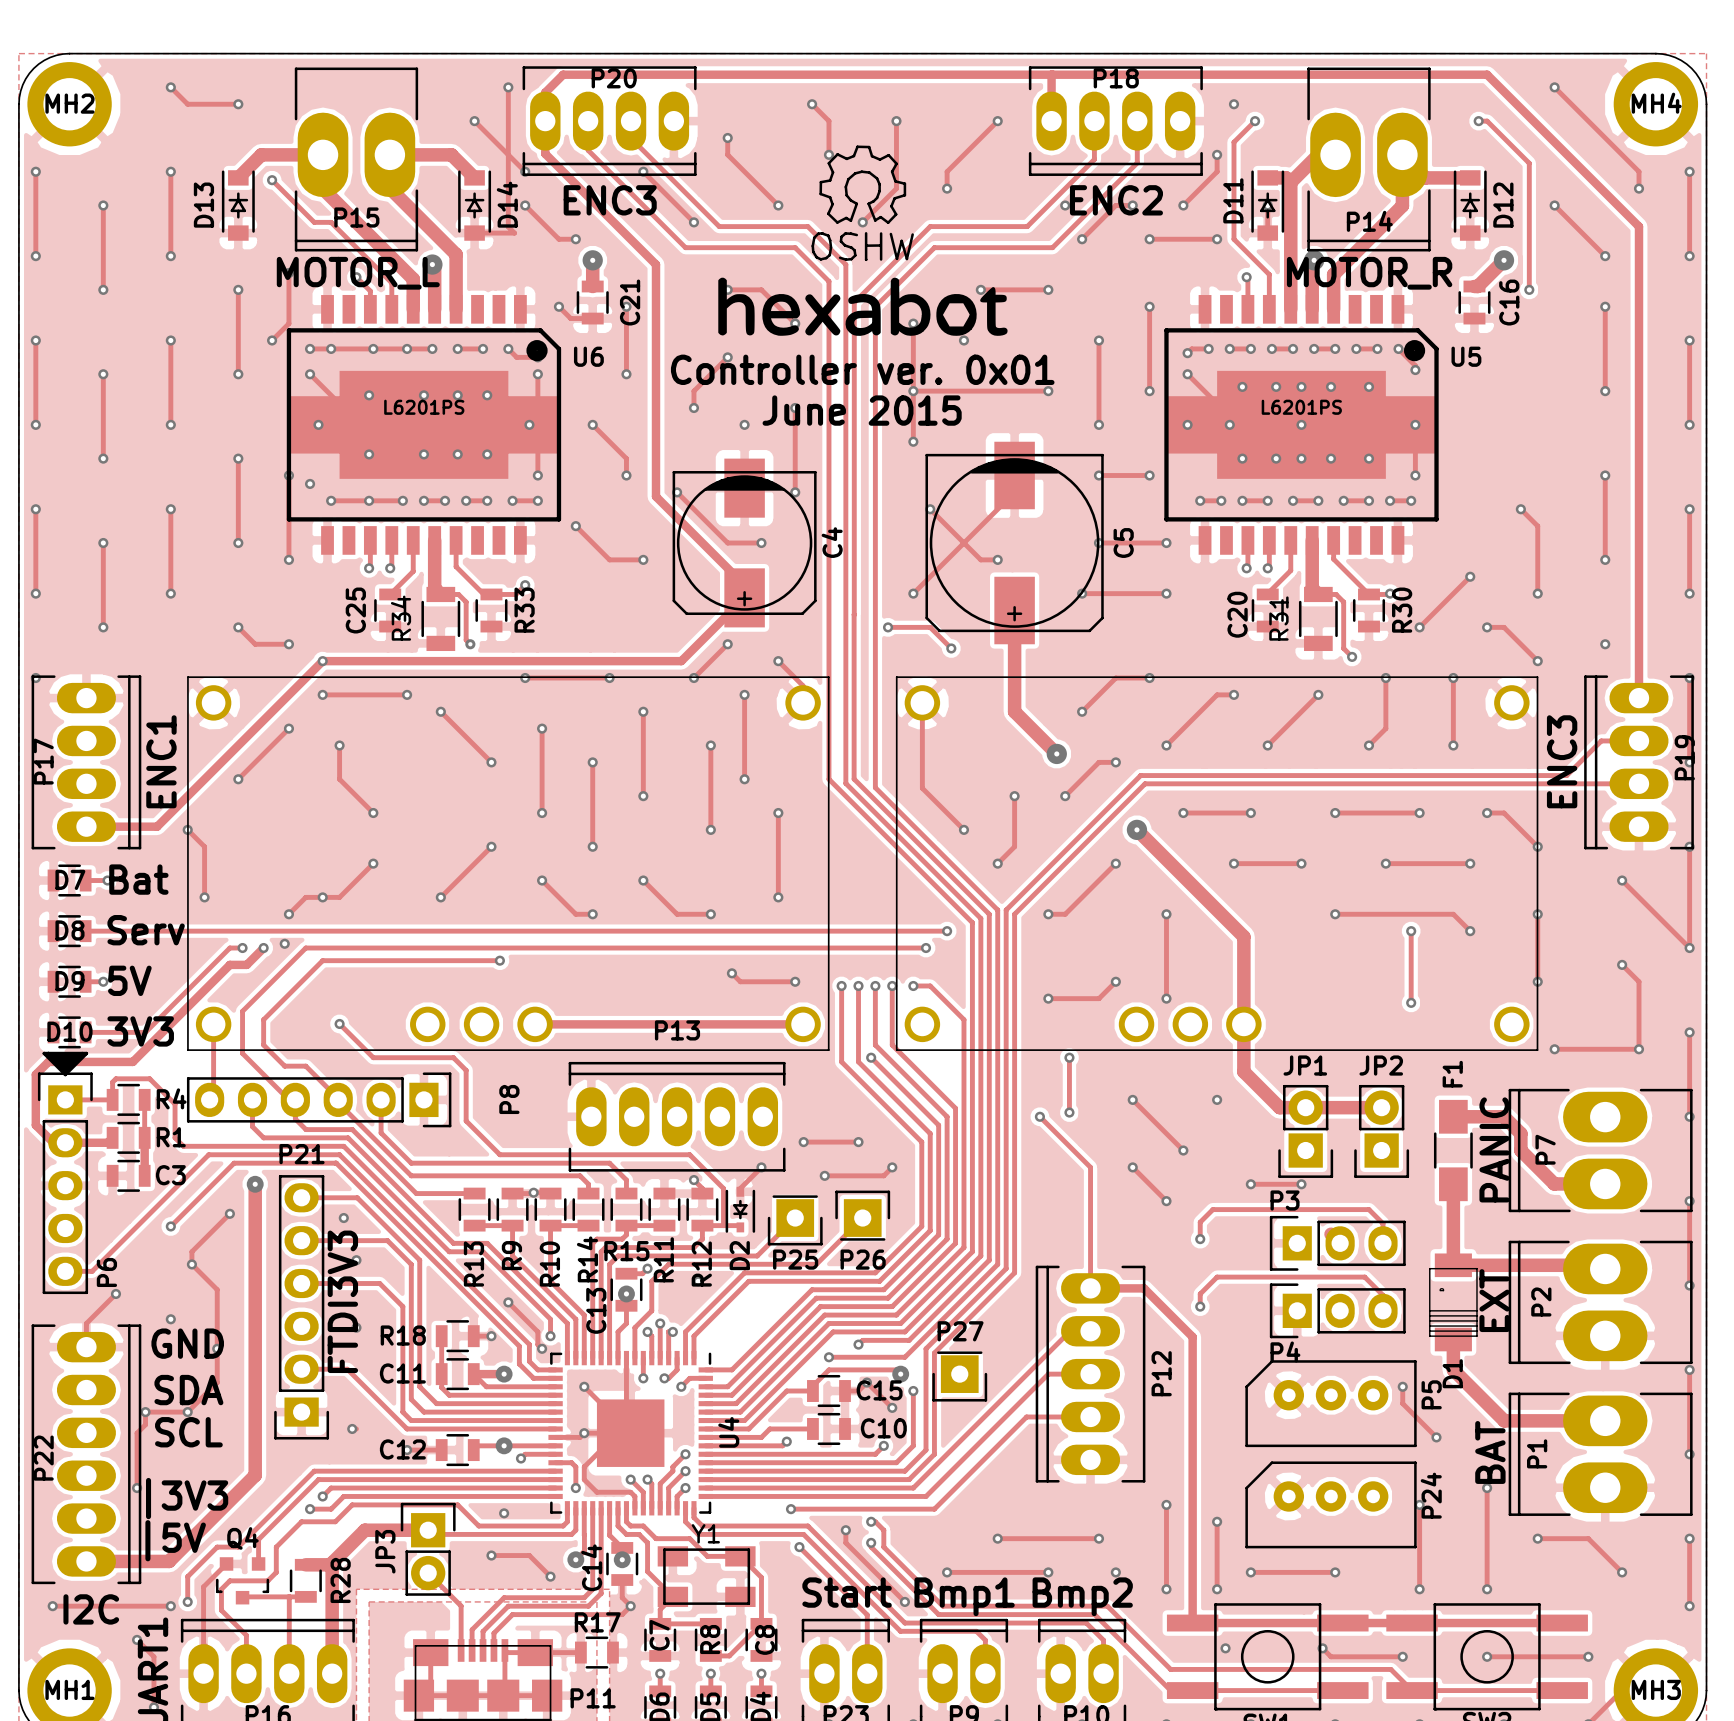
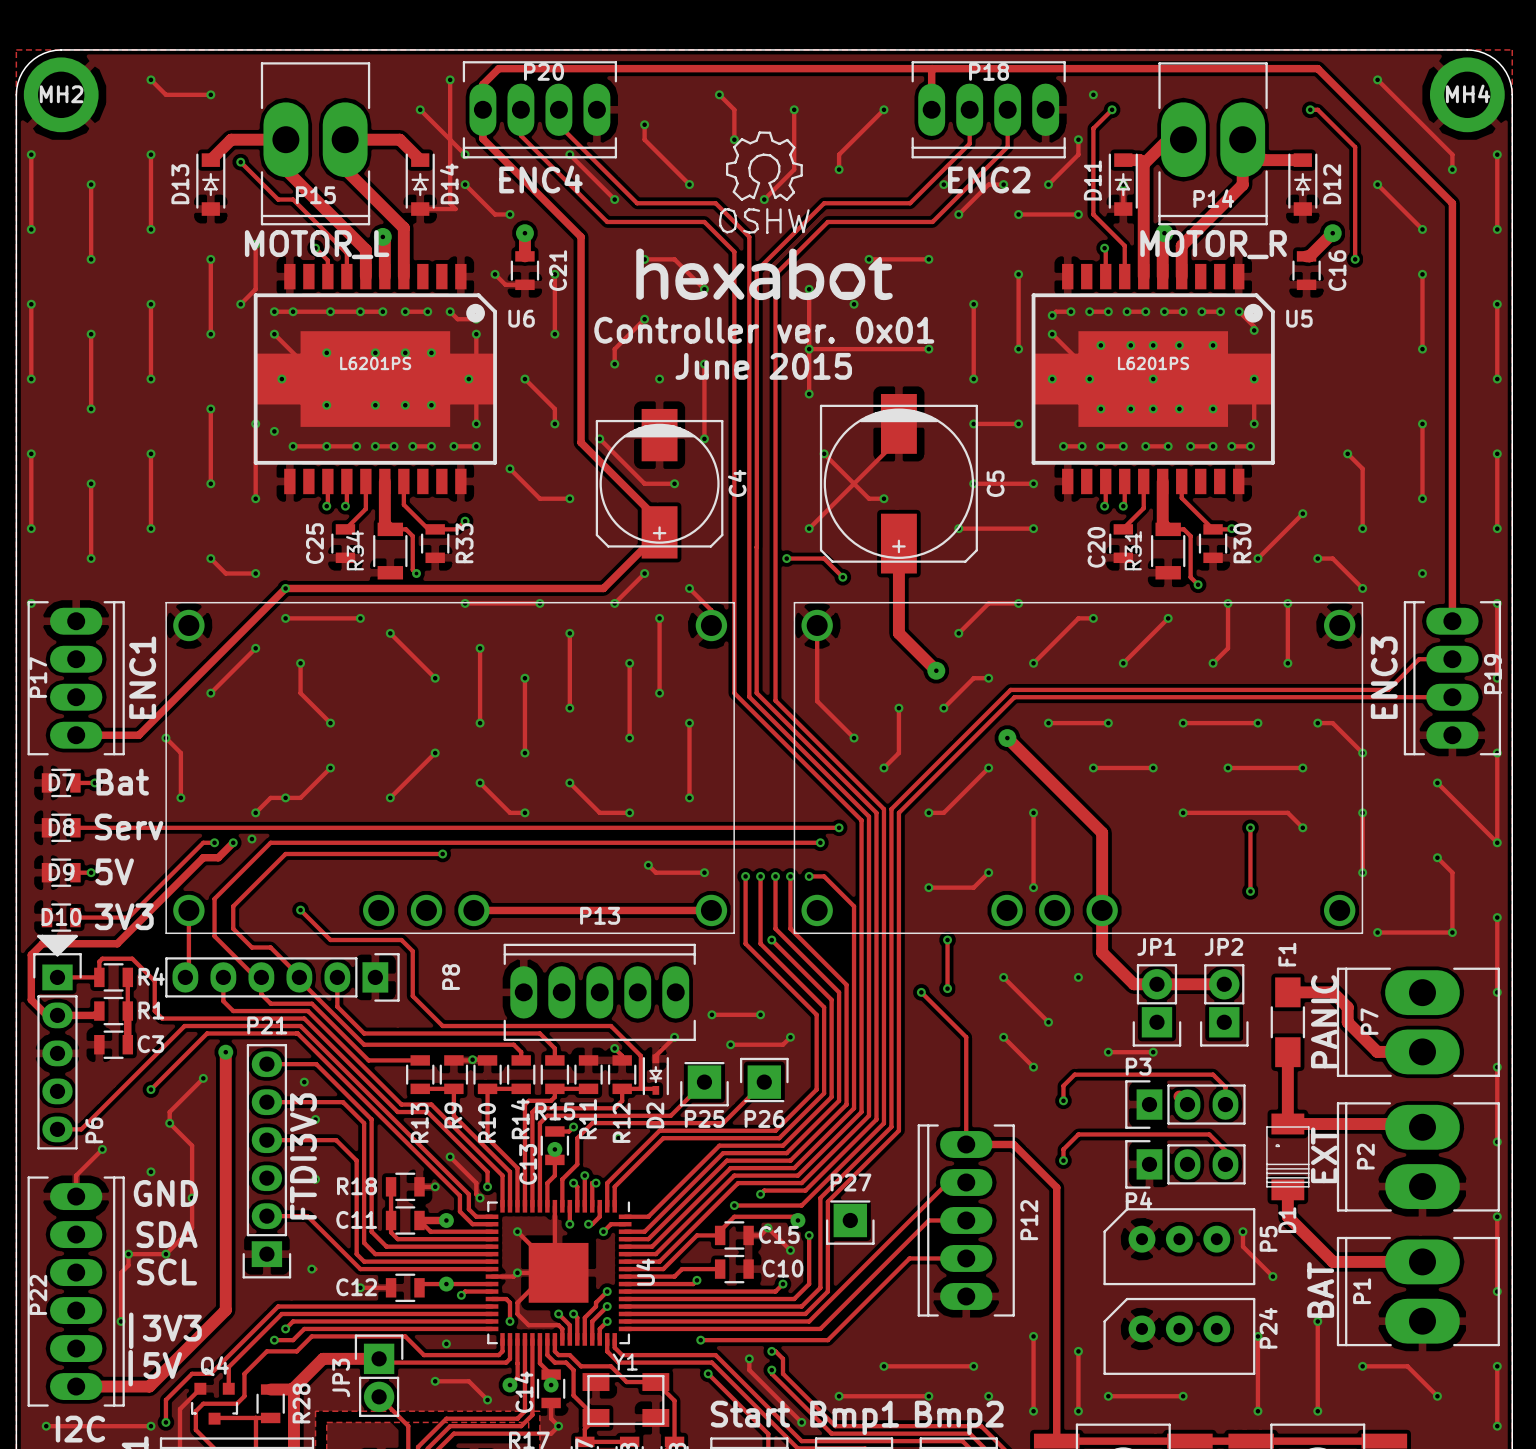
text: ENC3 (610, 200) -> ENC4 (540, 179)

